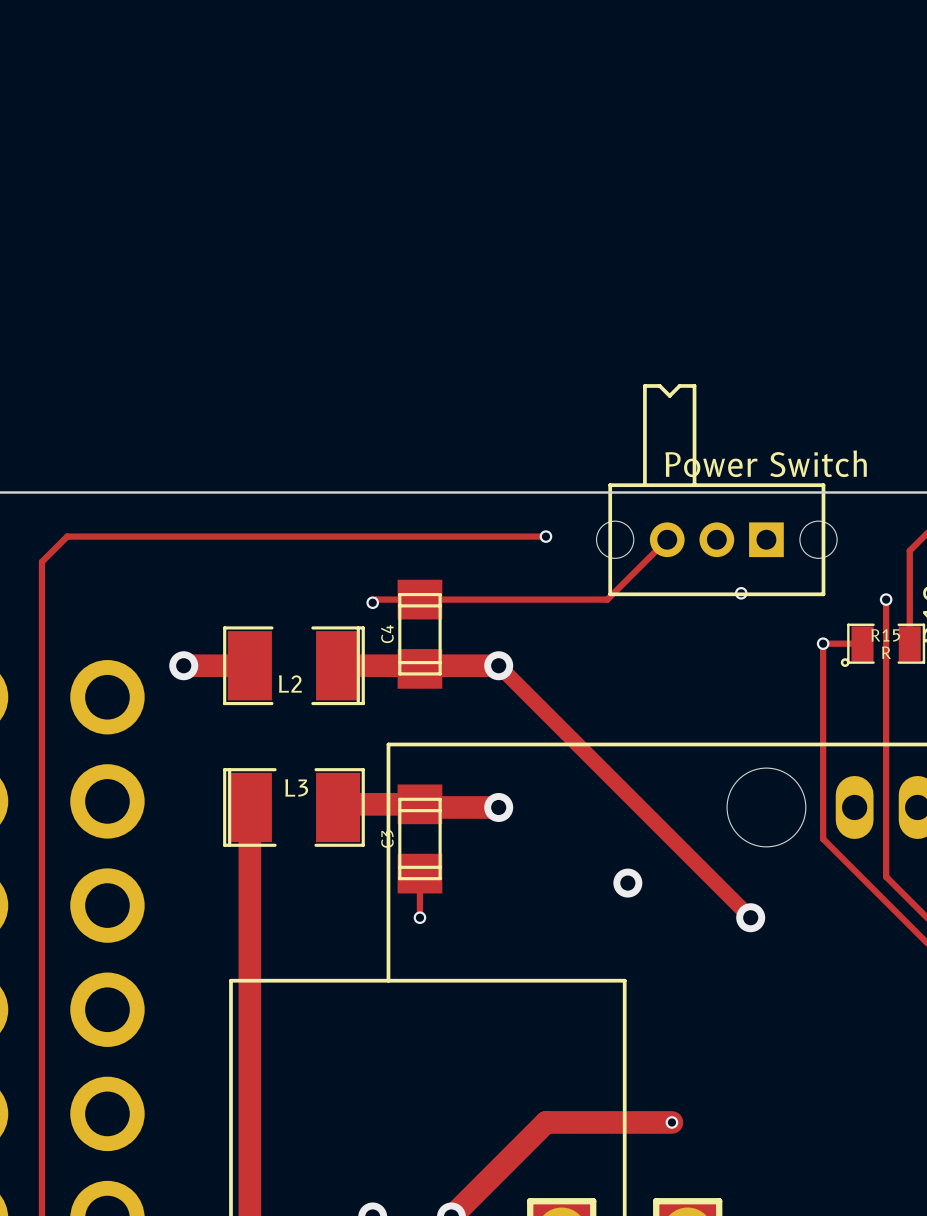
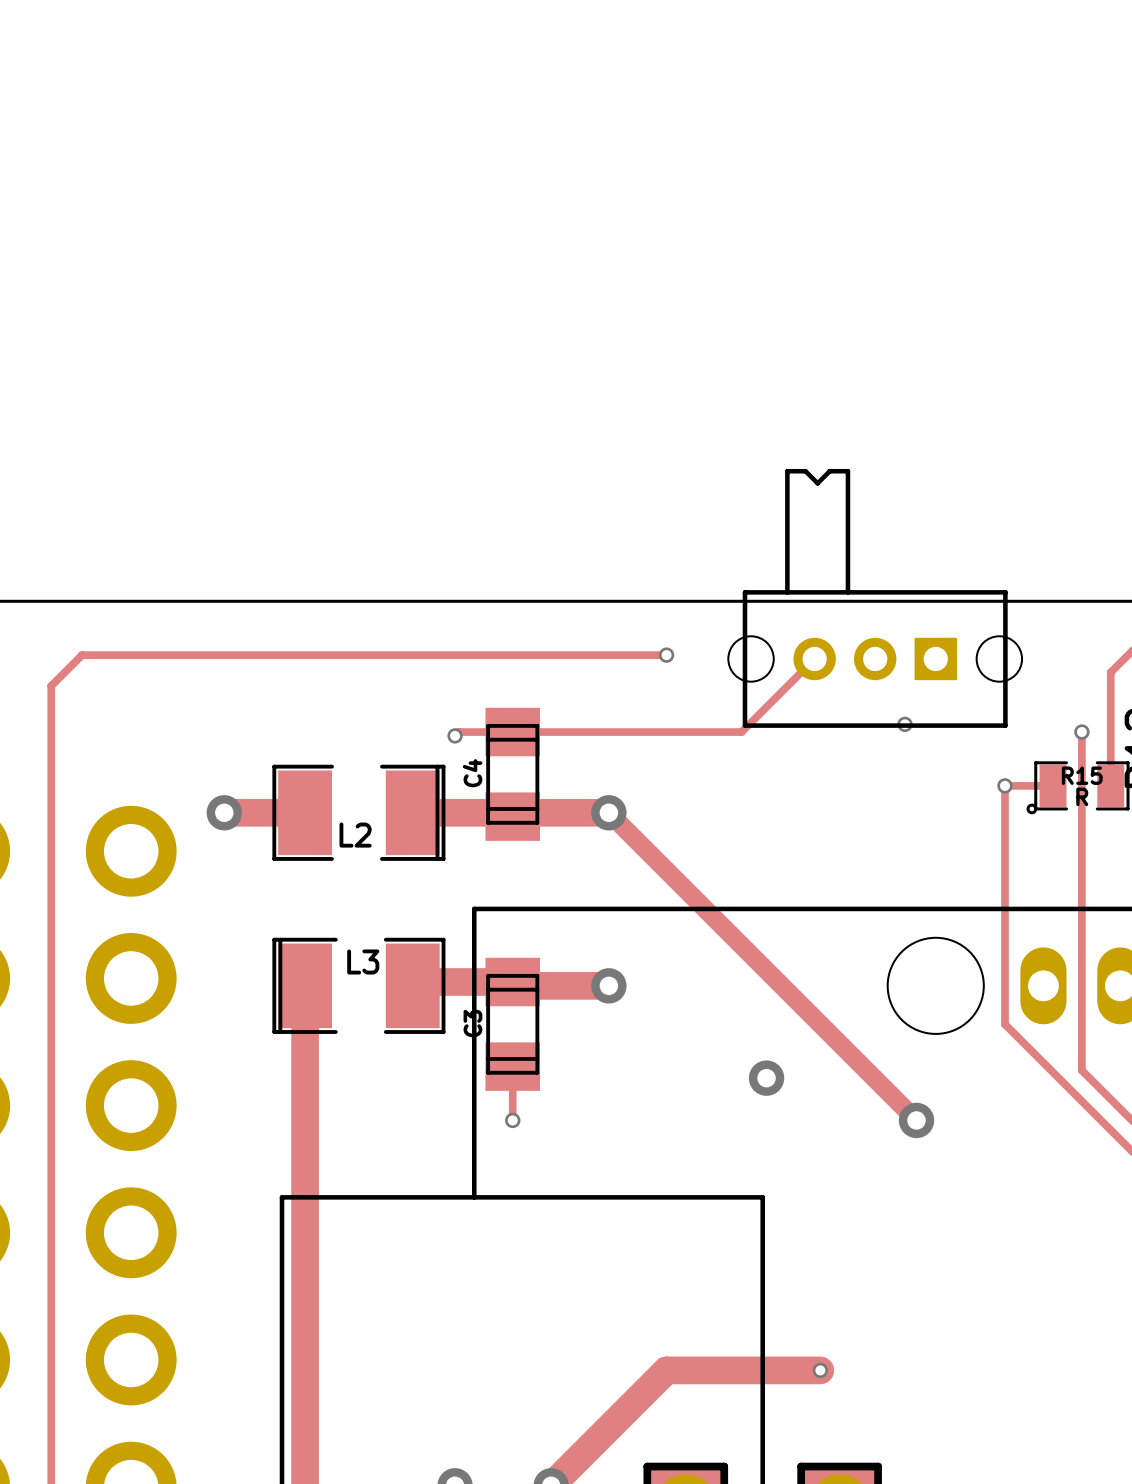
part value: Power Switch (766, 463) -> none

